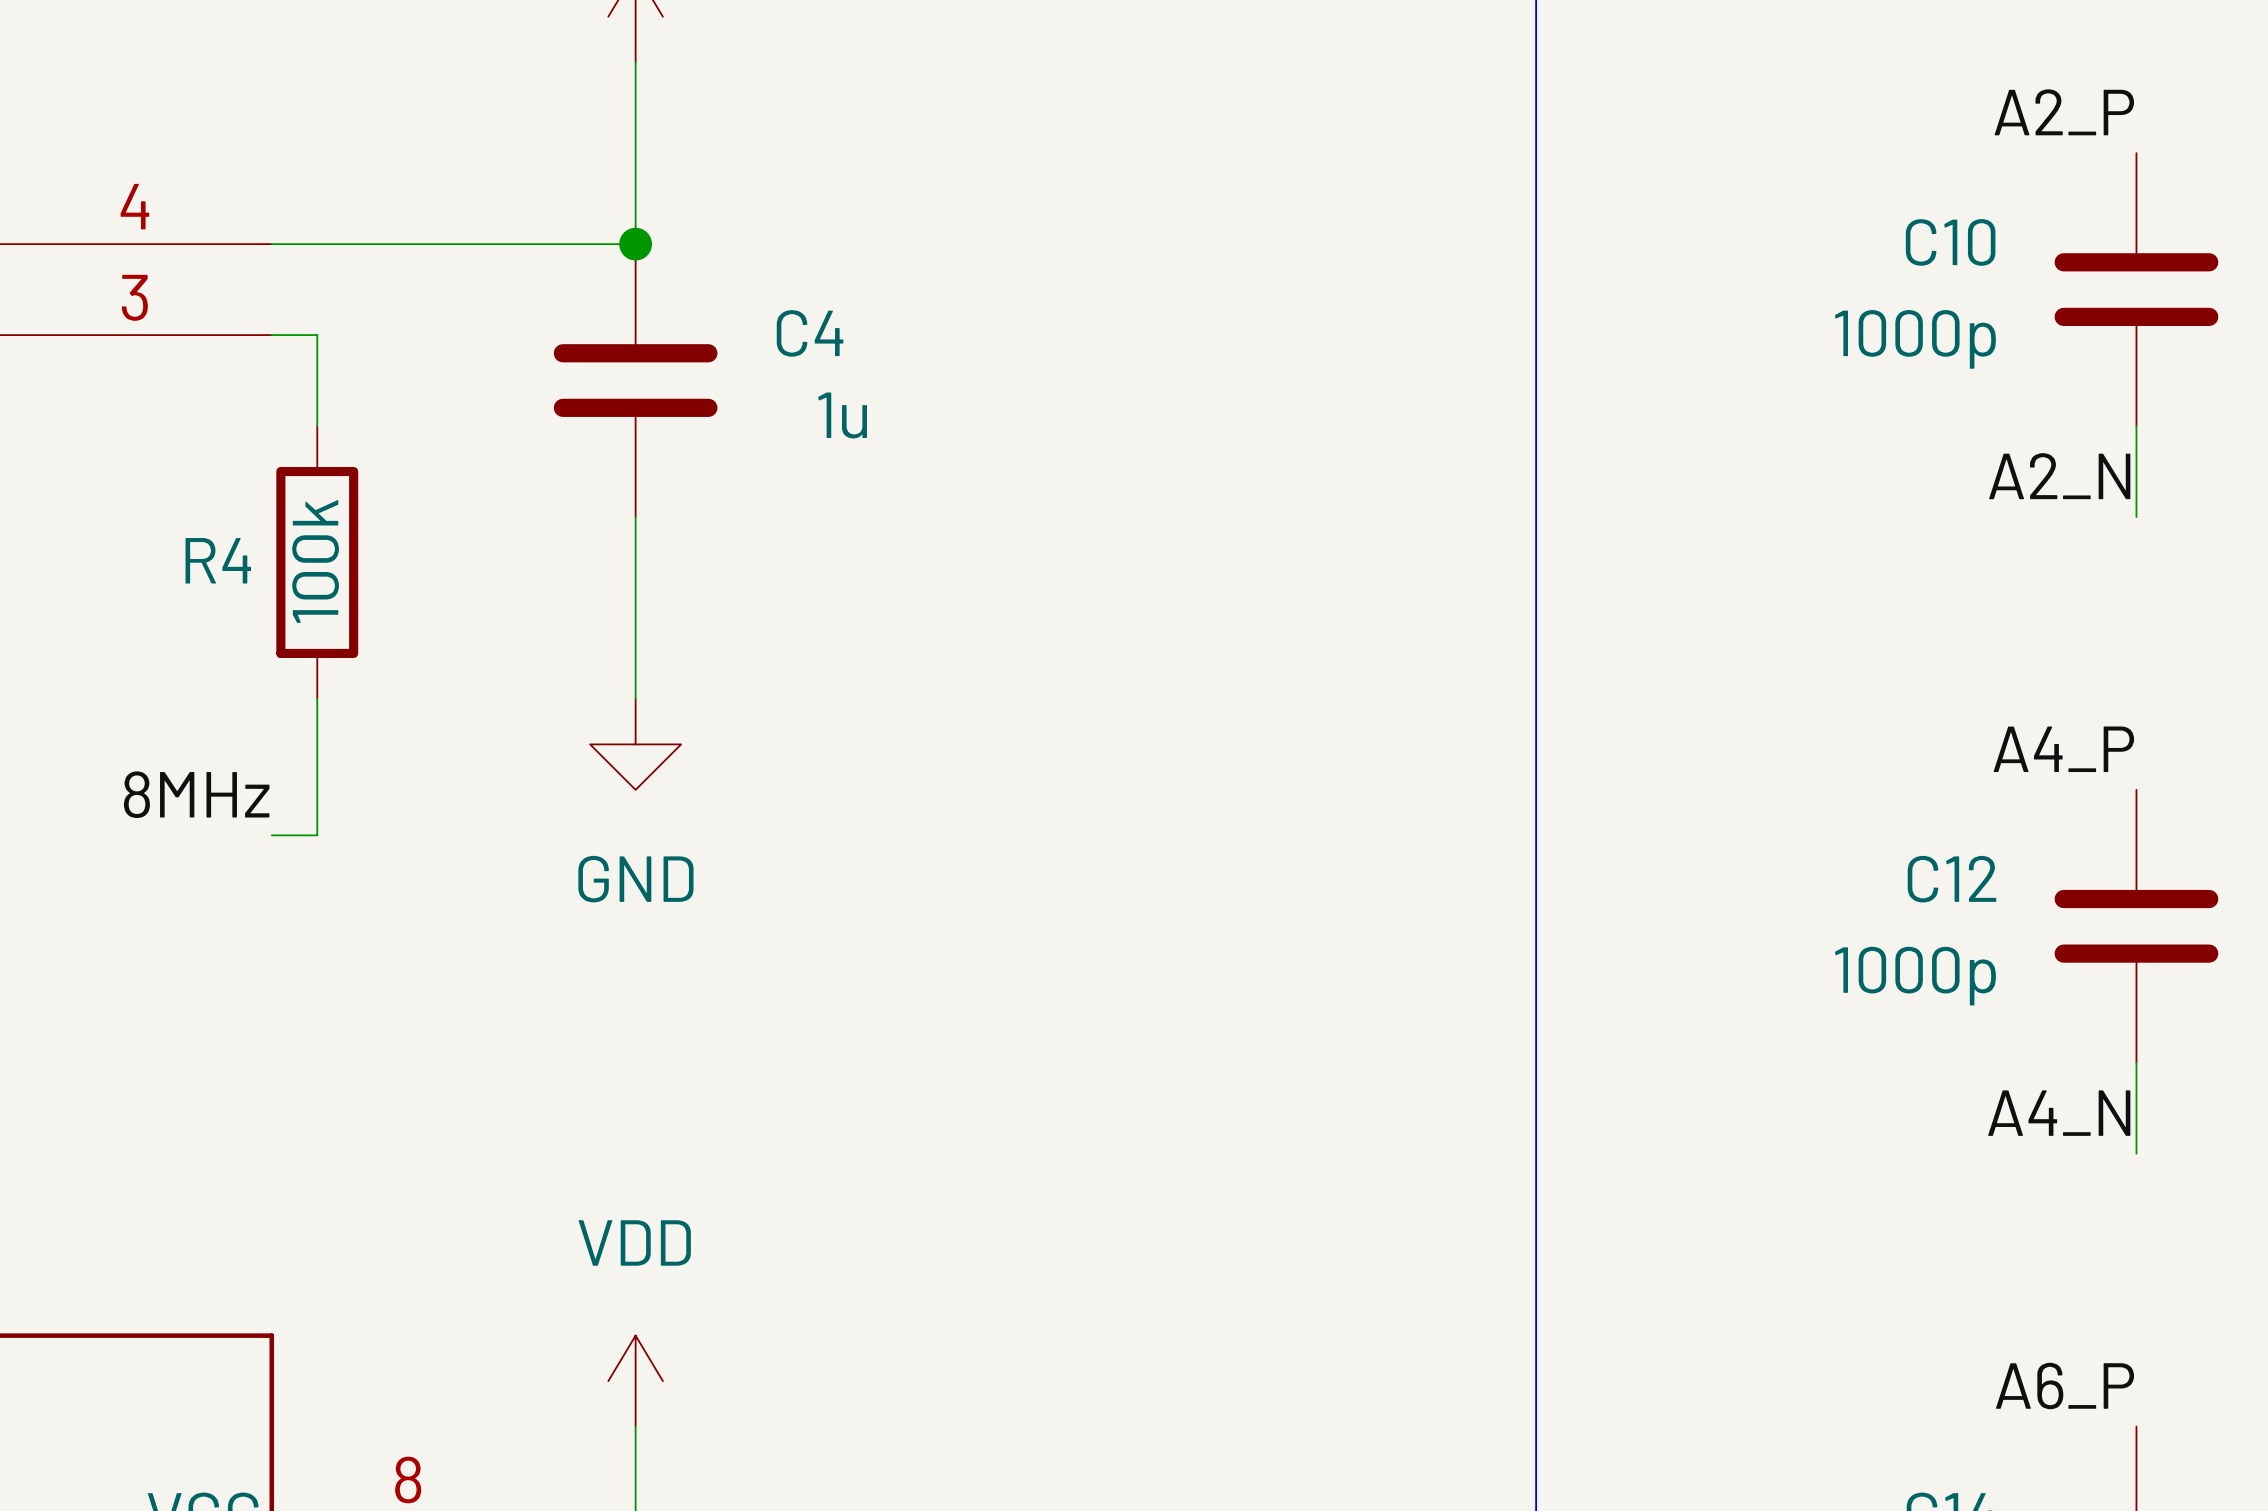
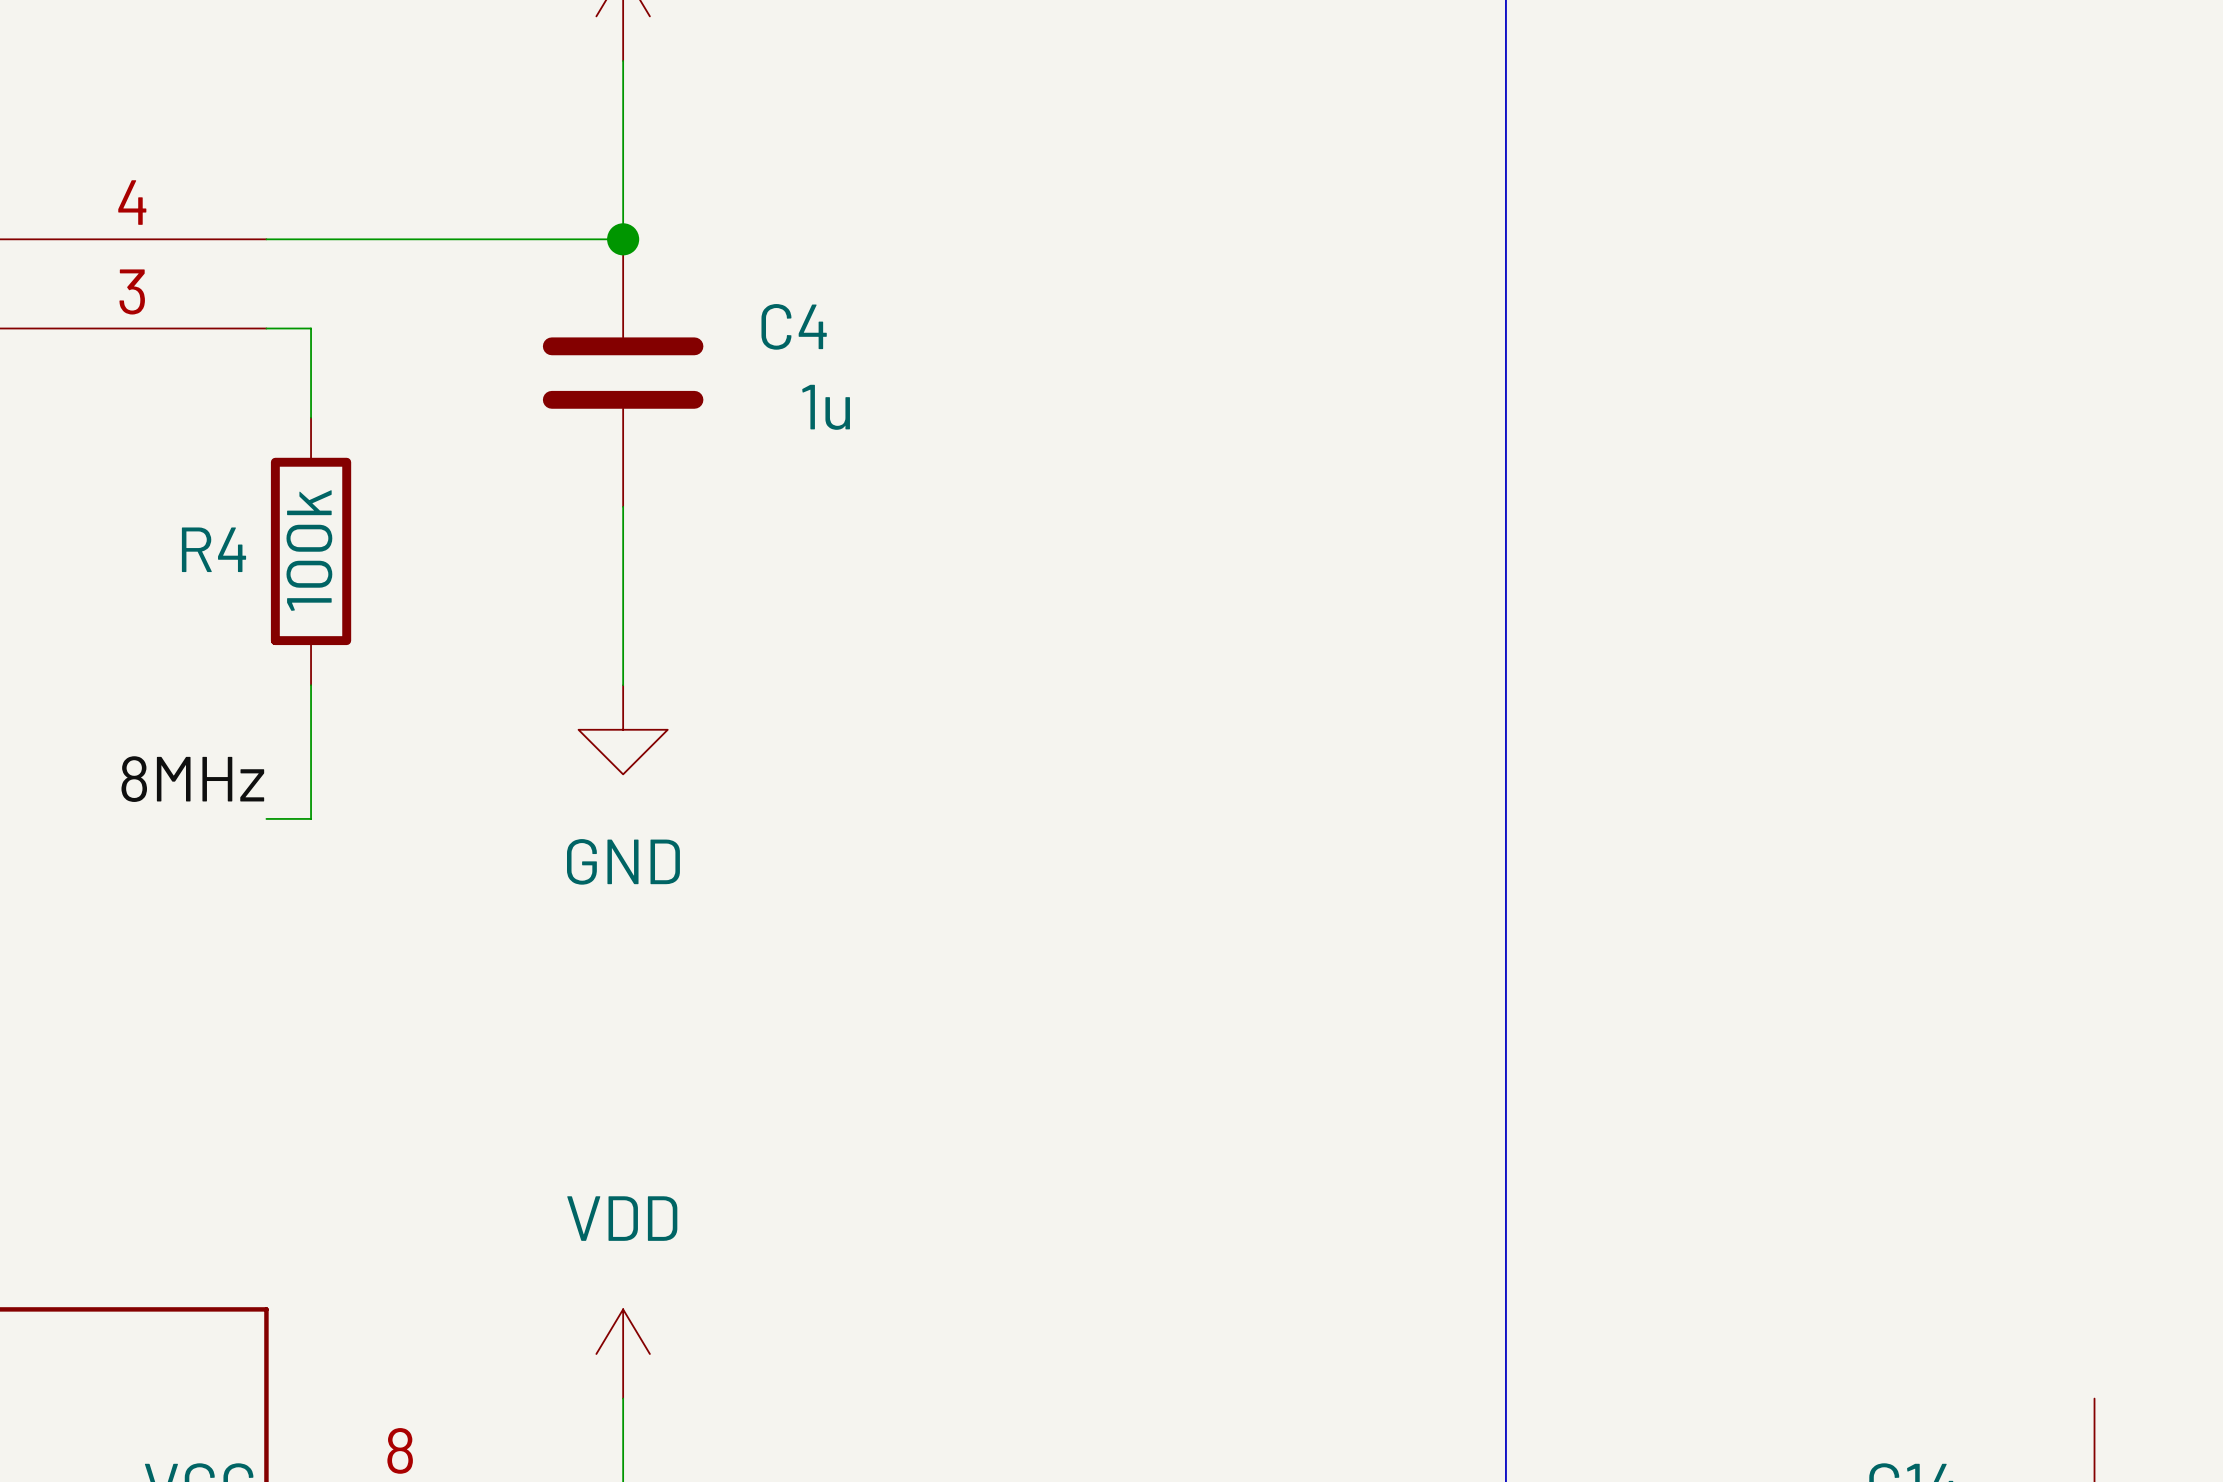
label: A2_P (2064, 112) -> none
C10: 1000p (2136, 289) -> none
wire: (2136, 426) (2136, 517) -> none
label: A2_N (2059, 476) -> none
label: A4_P (2063, 749) -> none
C12: 1000p (2136, 926) -> none
wire: (2136, 1062) (2136, 1153) -> none
label: A4_N (2059, 1113) -> none
label: A6_P (2064, 1385) -> none

